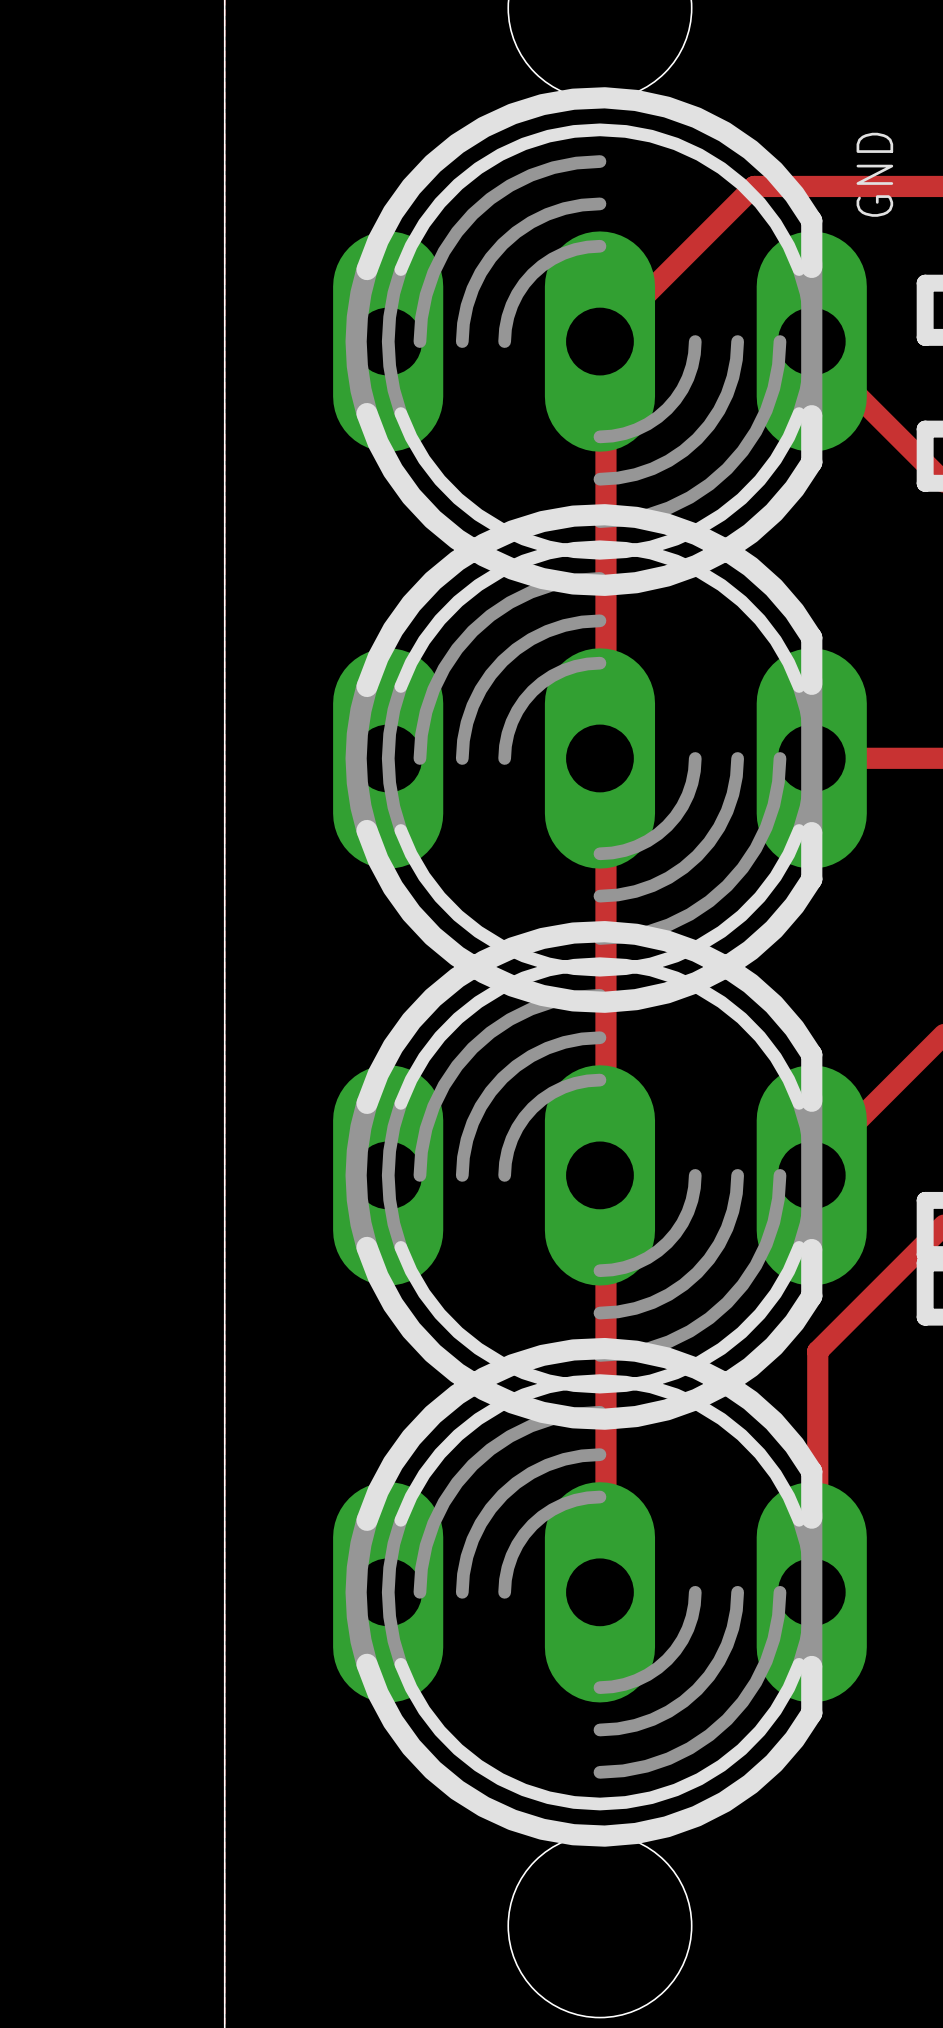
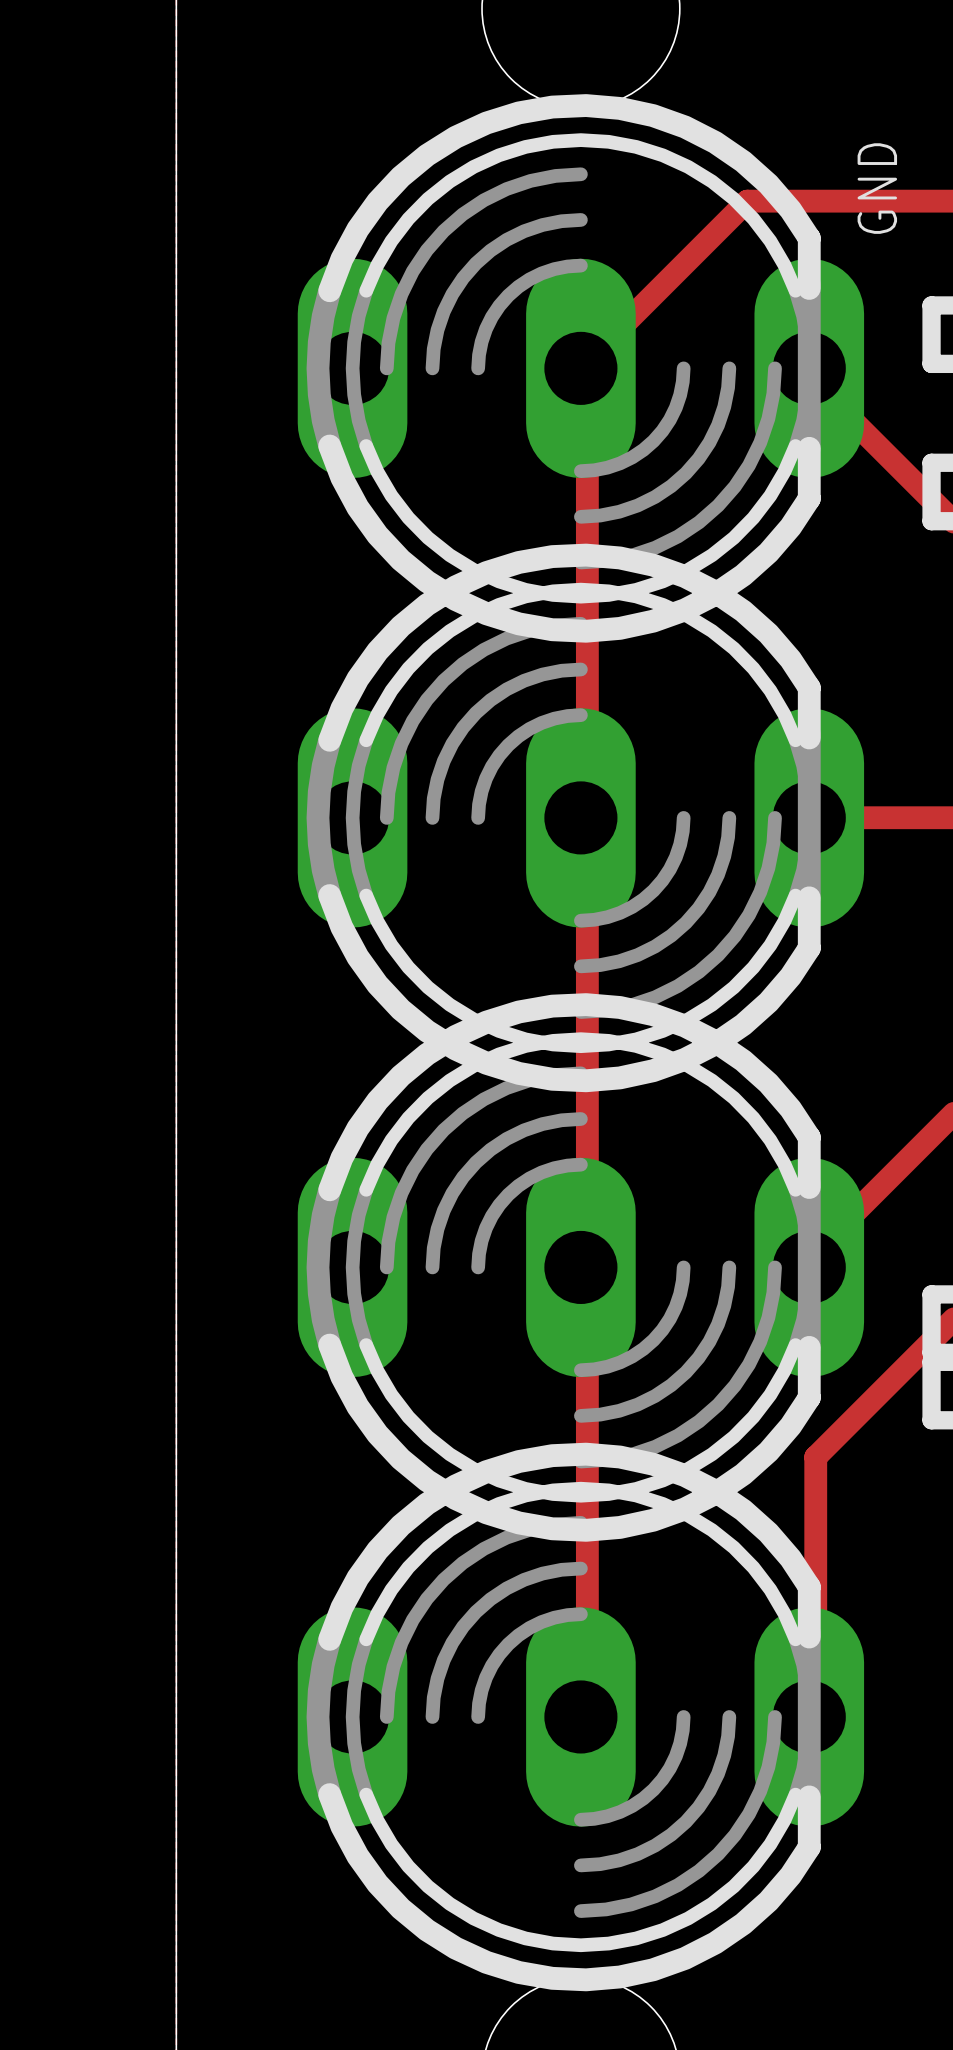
part footprint: [333, 87, 867, 596] -> [297, 94, 865, 643]
part footprint: [333, 504, 867, 1013] -> [297, 543, 865, 1093]
part footprint: [333, 921, 867, 1430] -> [297, 993, 865, 1542]
part footprint: [333, 1337, 867, 1847] -> [297, 1442, 865, 1992]

